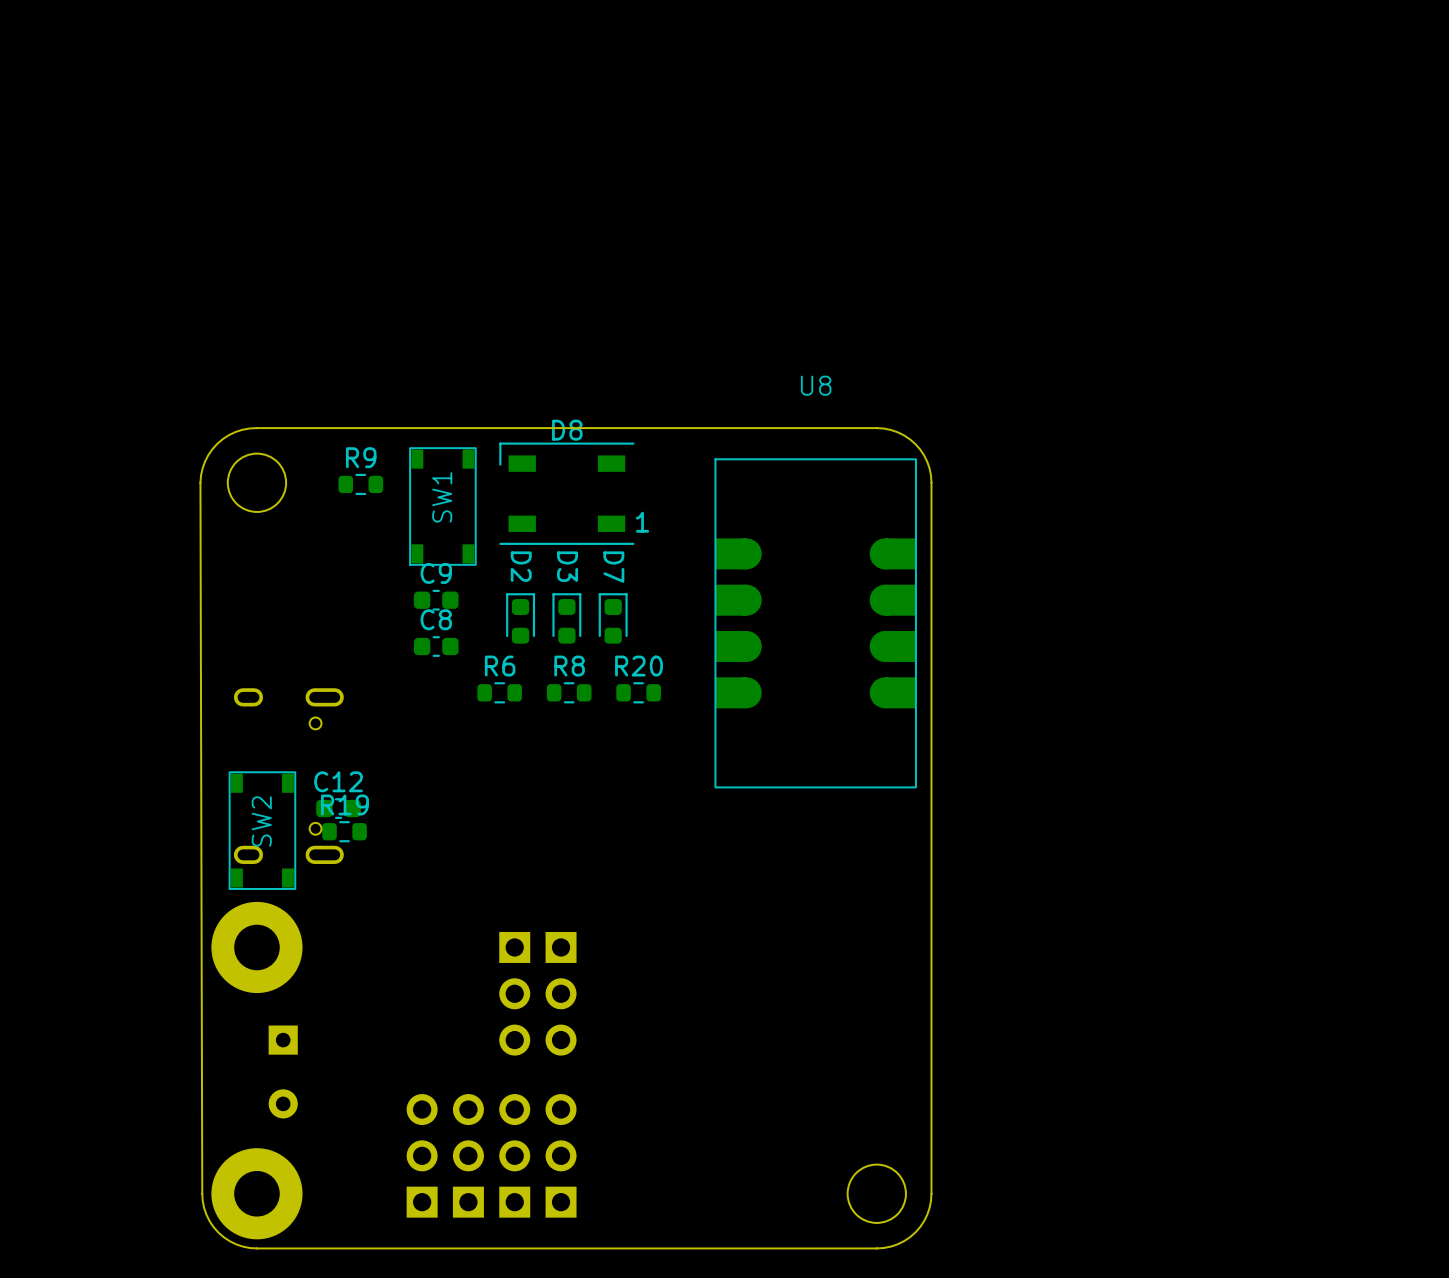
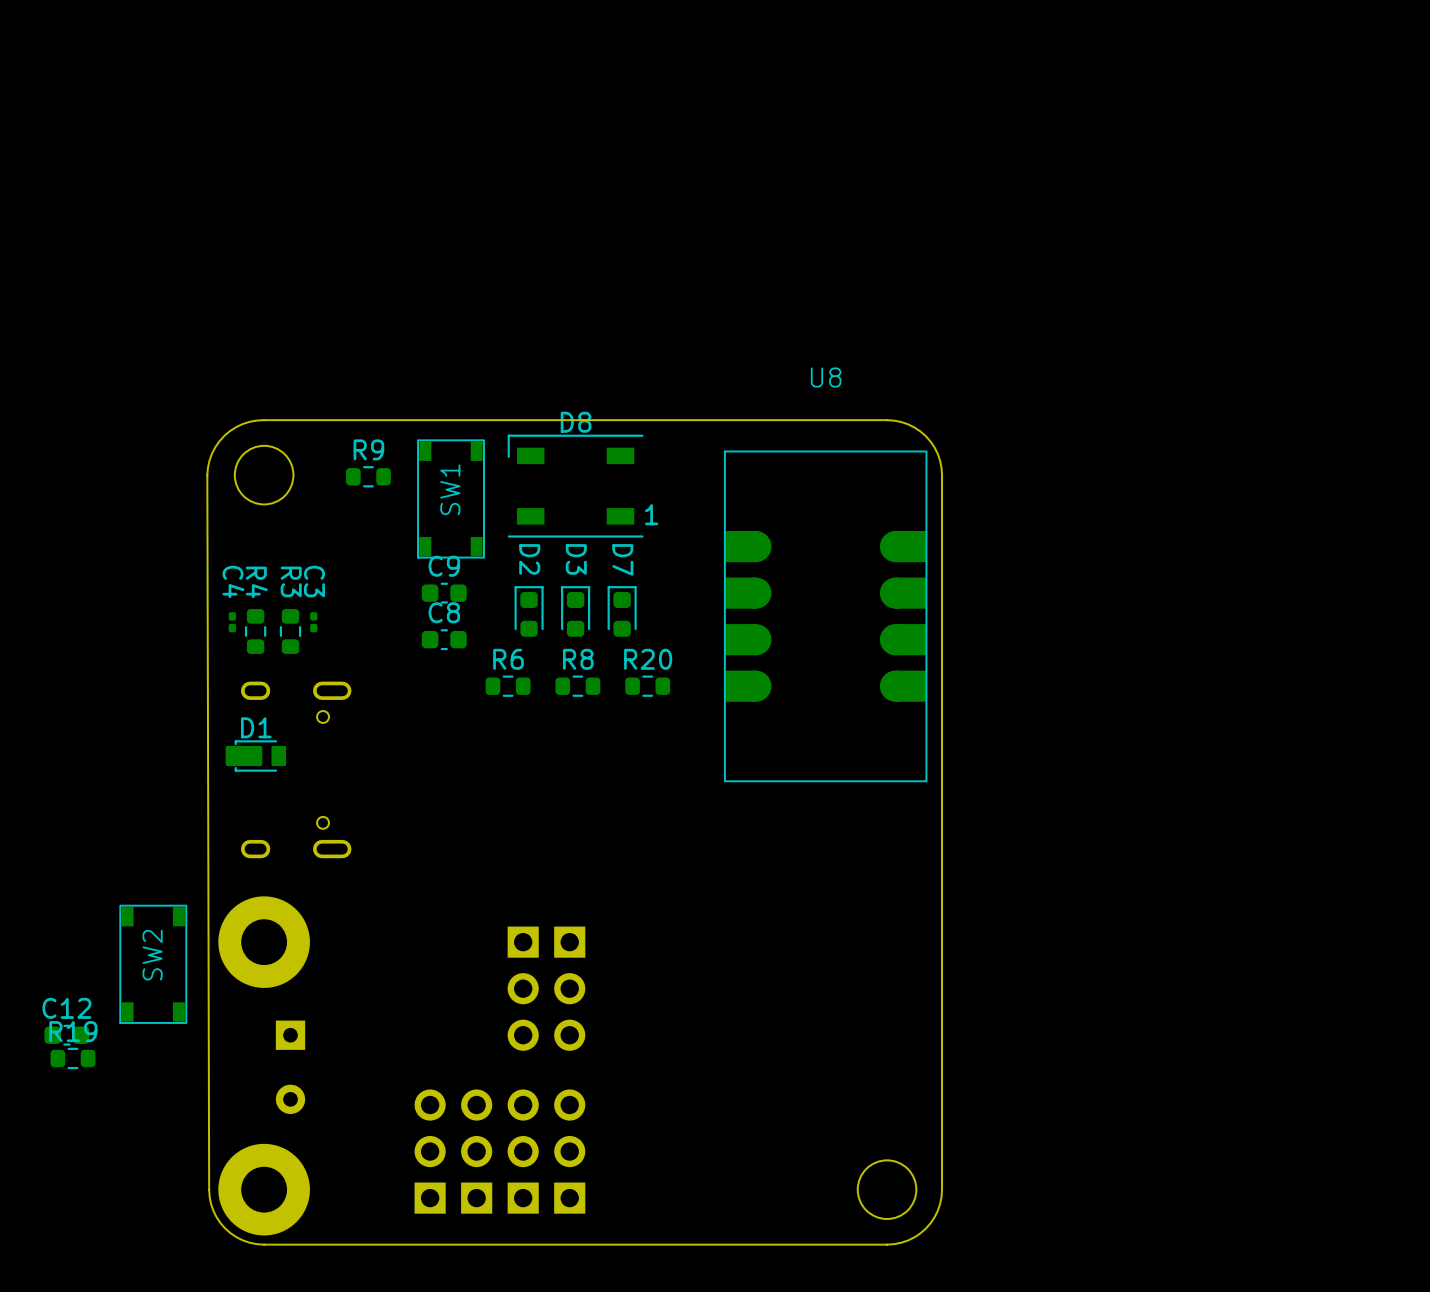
C4: none -> (232, 622)
C3: none -> (313, 622)
R4: none -> (255, 631)
R3: none -> (290, 631)
D1: none -> (255, 756)
C12 position: (338, 808) -> (66, 1035)
SW2 position: (262, 830) -> (153, 964)
R19 position: (344, 831) -> (72, 1058)

